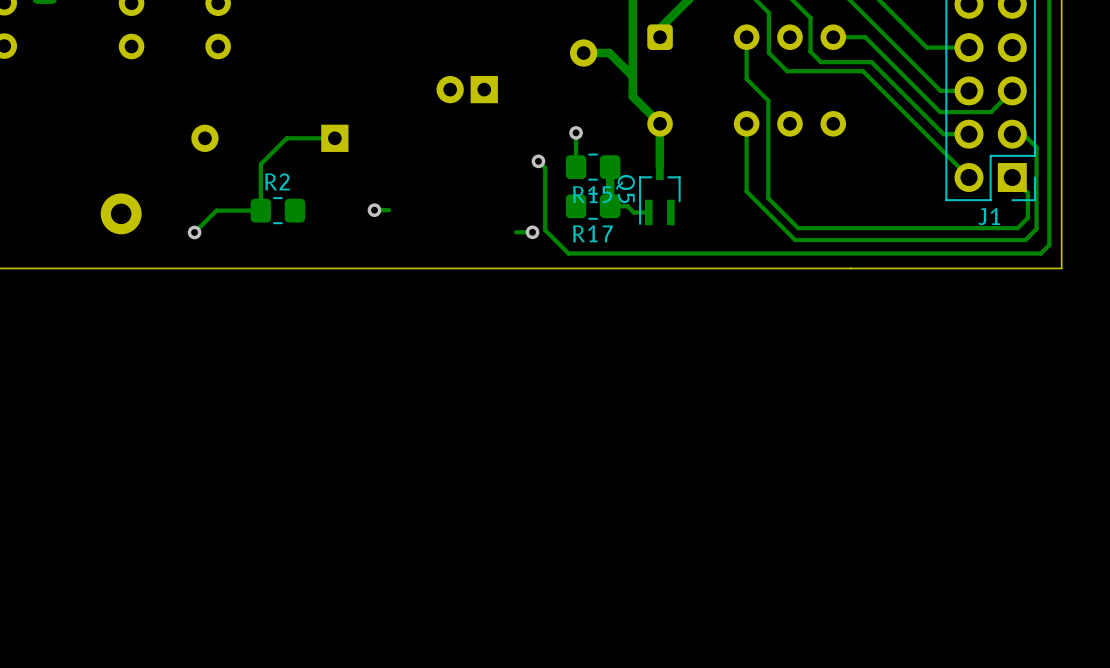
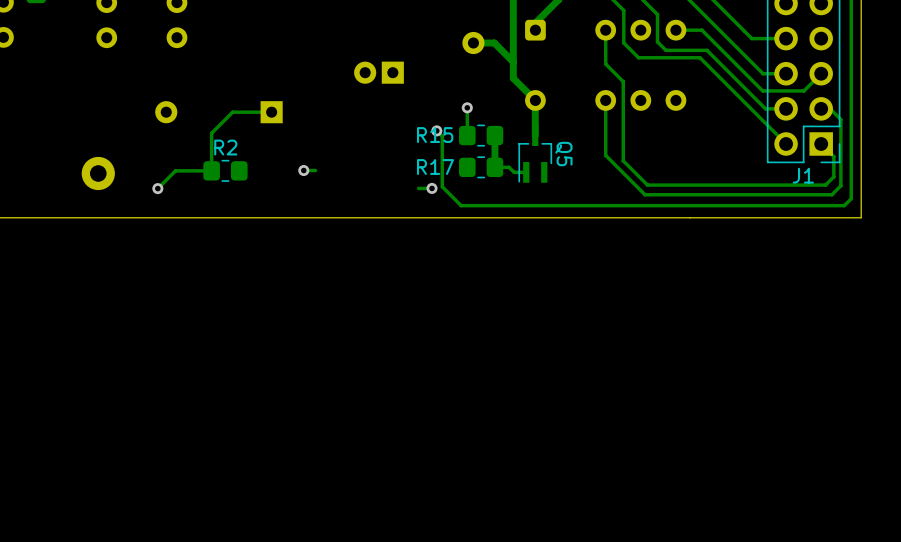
Q5 name position: Q5 (625, 189) -> Q5 (563, 154)
R15 name position: R15 (592, 194) -> R15 (435, 135)
R17 name position: R17 (592, 233) -> R17 (435, 167)

